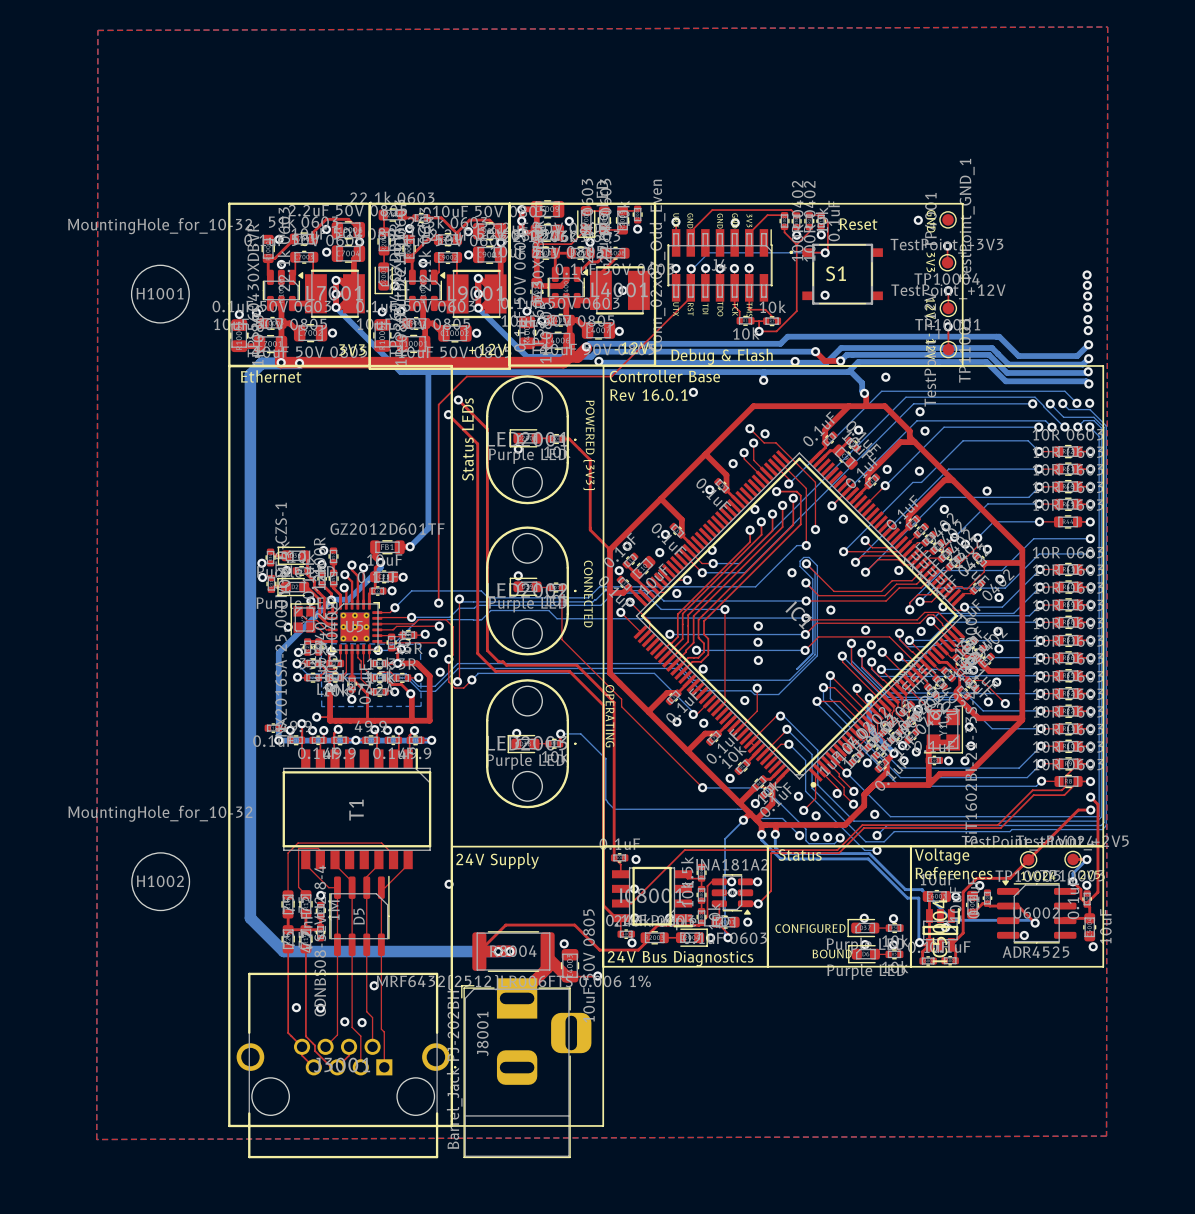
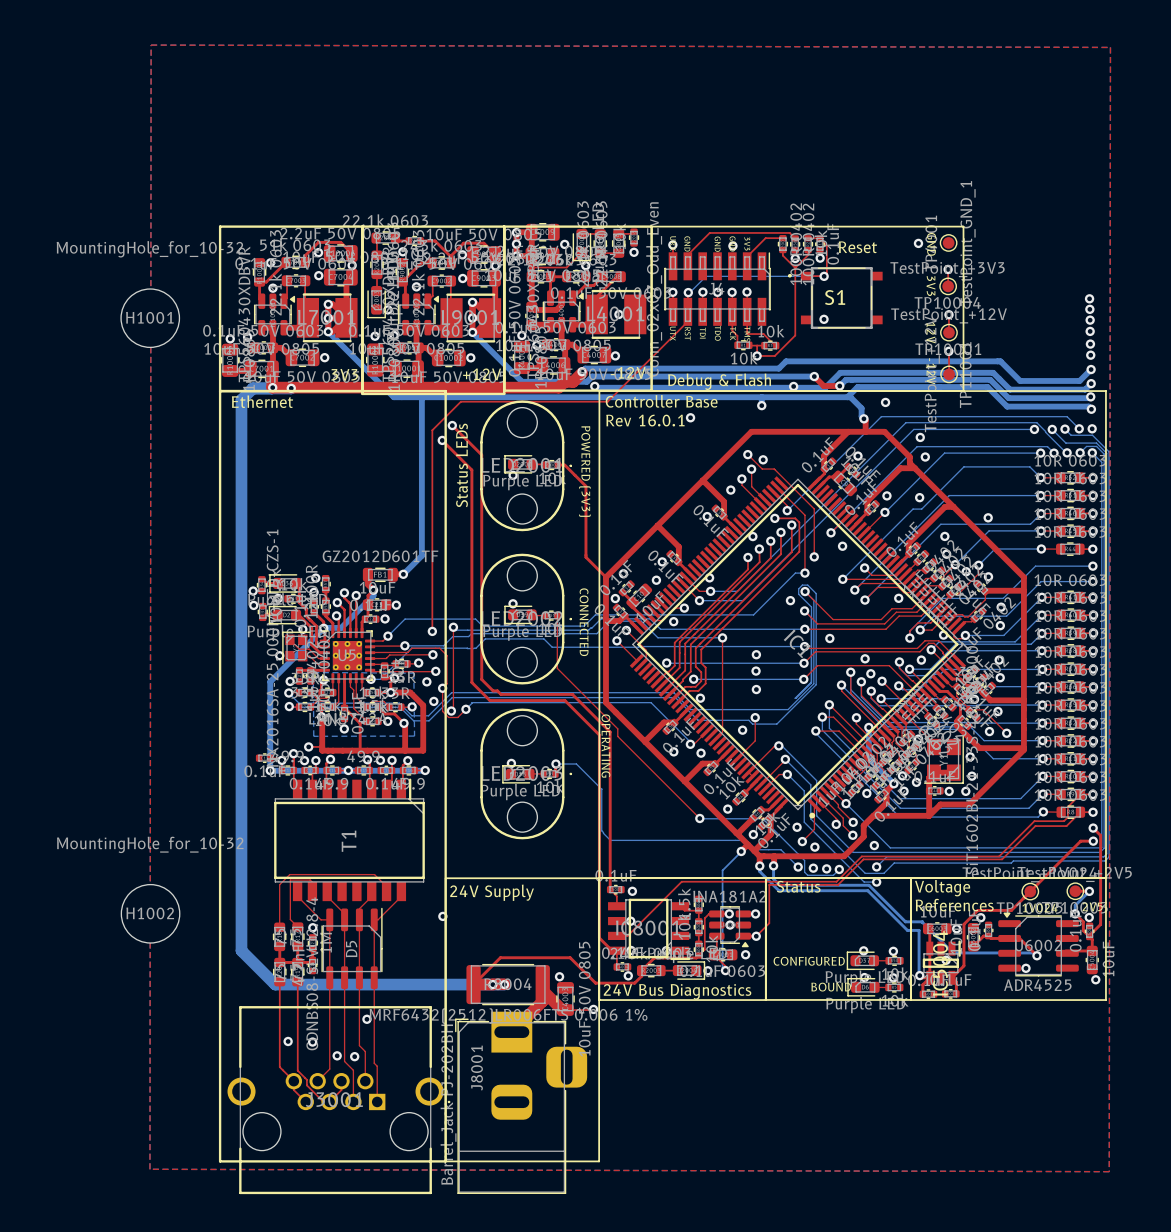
top zone outline: (1107, 27) (97, 30) (96, 1139) (1106, 1136) -> (1110, 47) (151, 45) (149, 1169) (1109, 1171)

